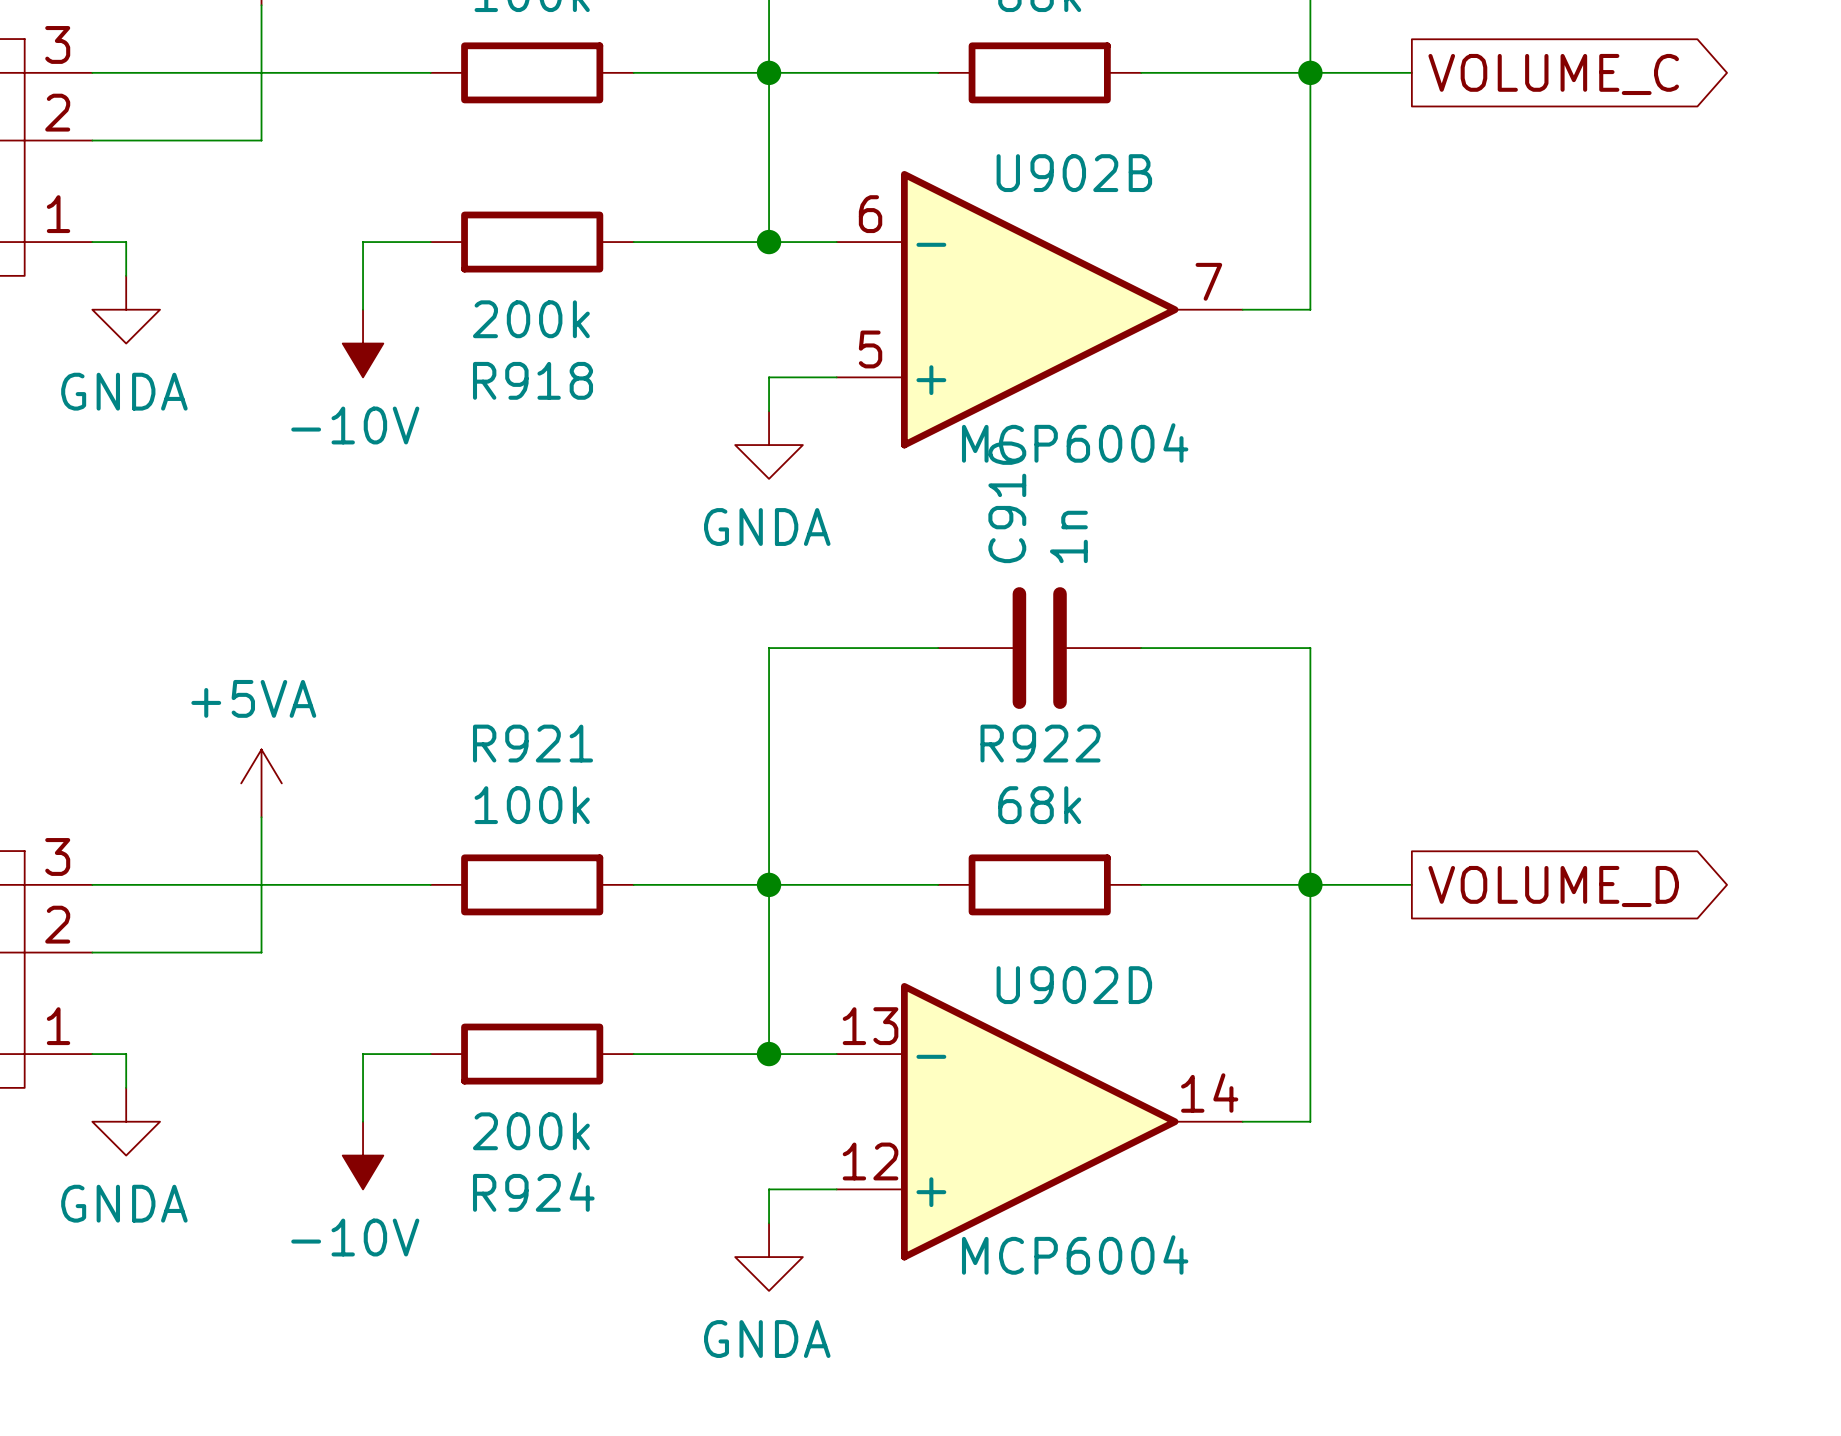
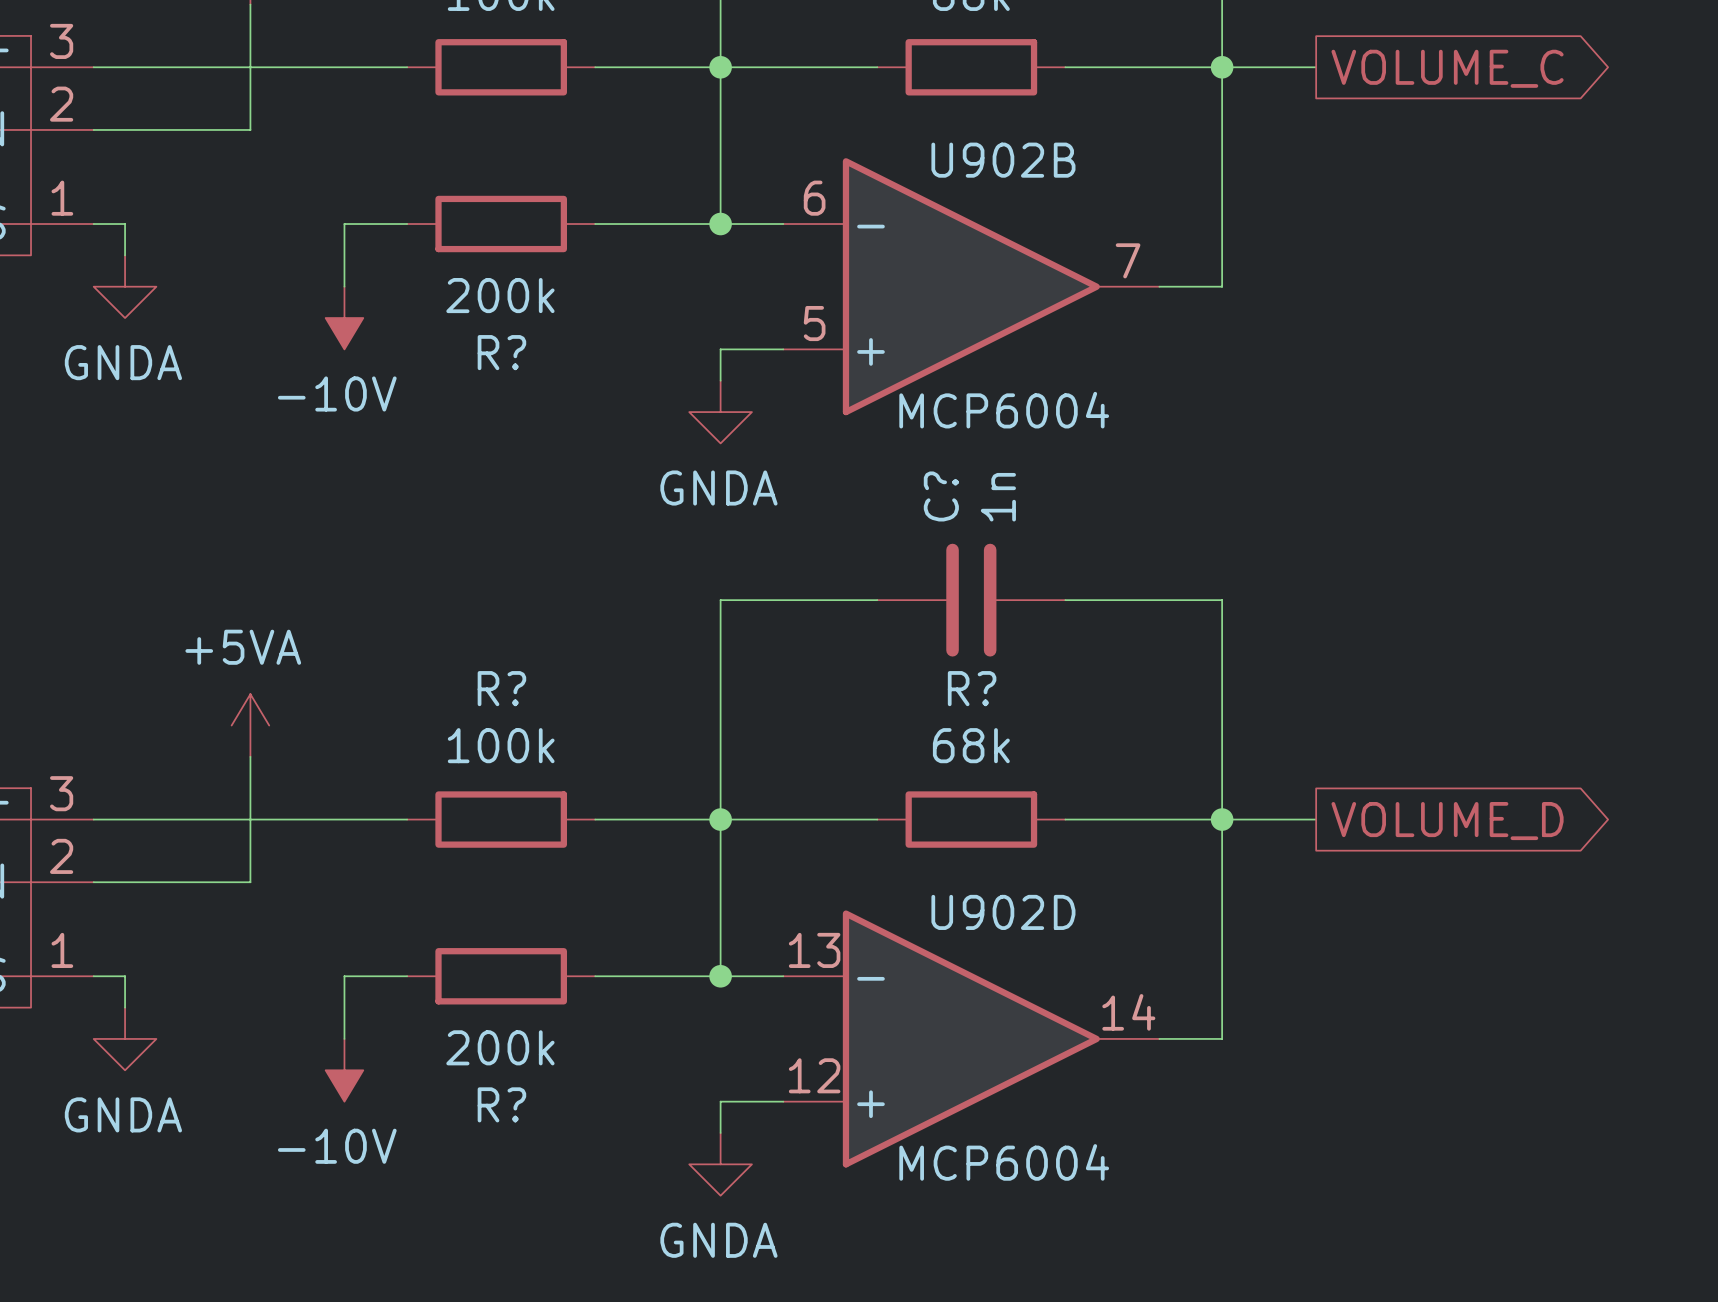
R918 name: R918 (533, 380) -> R? (501, 352)
C910 name: C910 (1007, 502) -> C? (941, 496)
R921 name: R921 (533, 743) -> R? (501, 688)
R922 name: R922 (1040, 743) -> R? (972, 688)
R924 name: R924 (533, 1192) -> R? (501, 1104)

